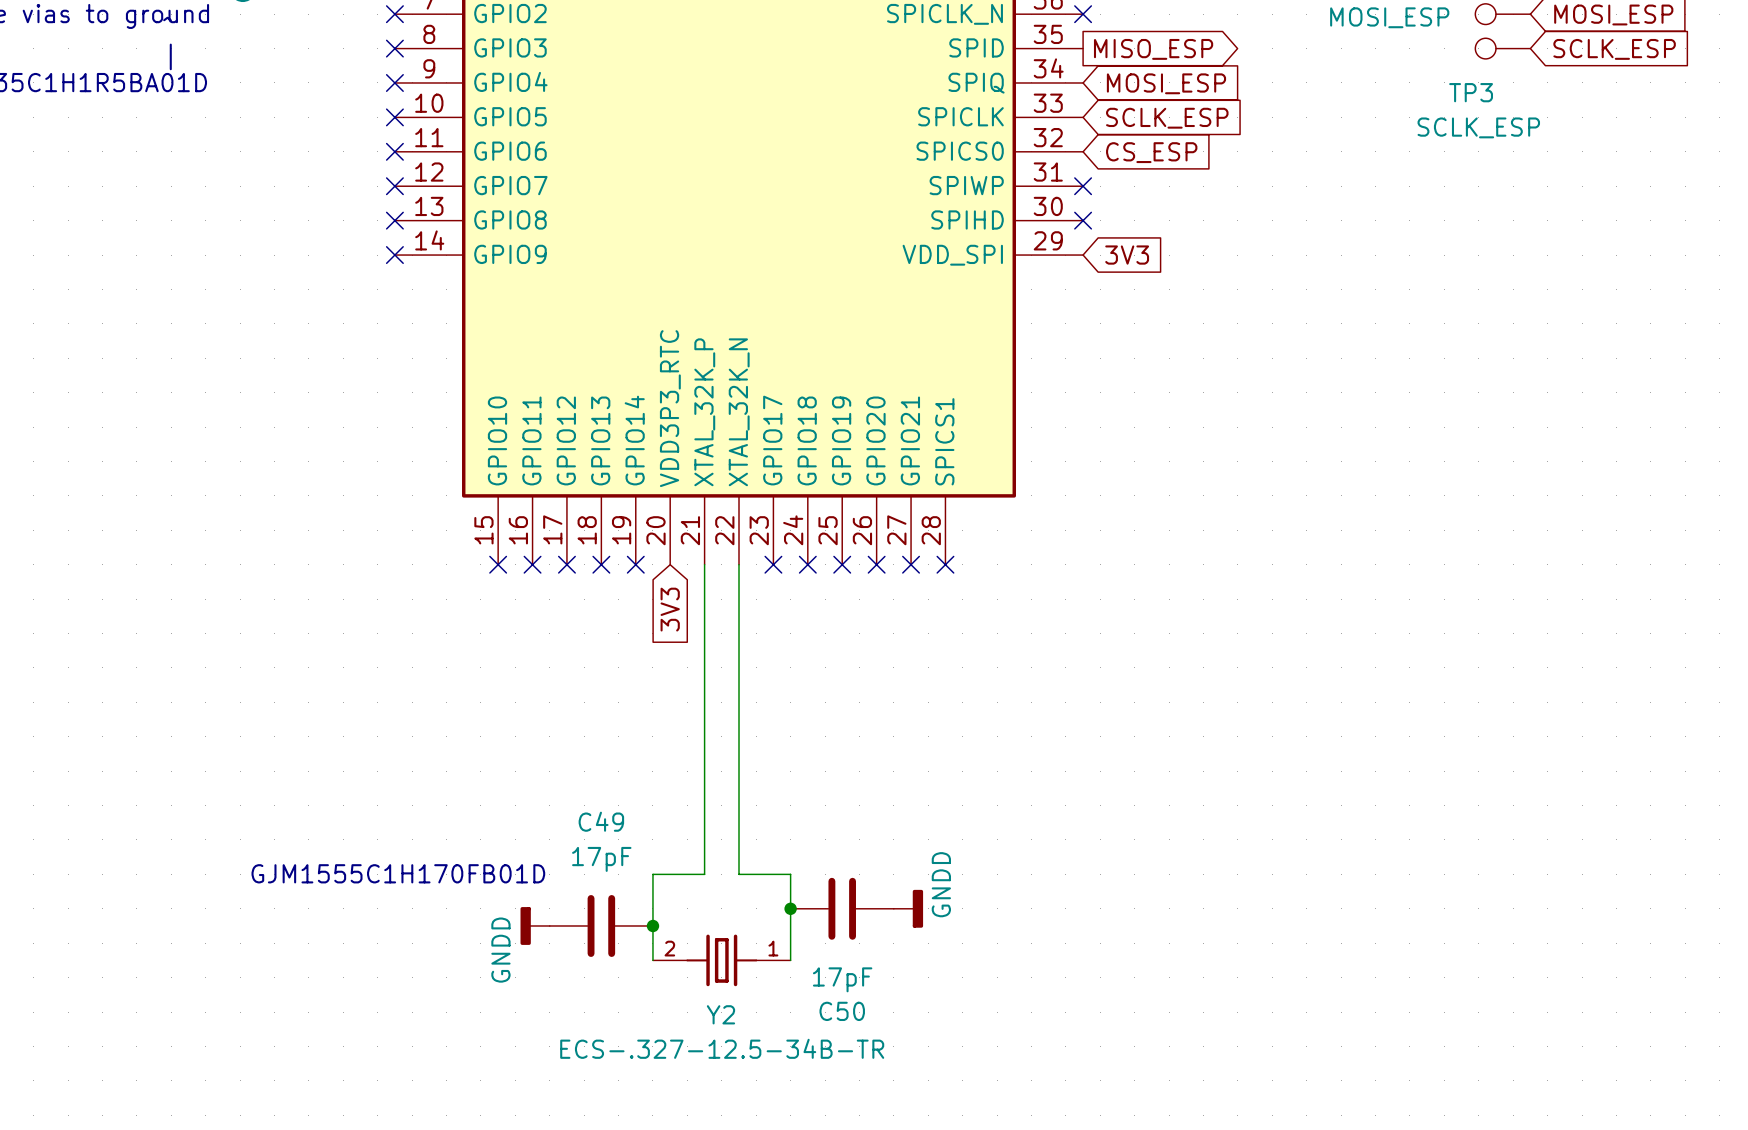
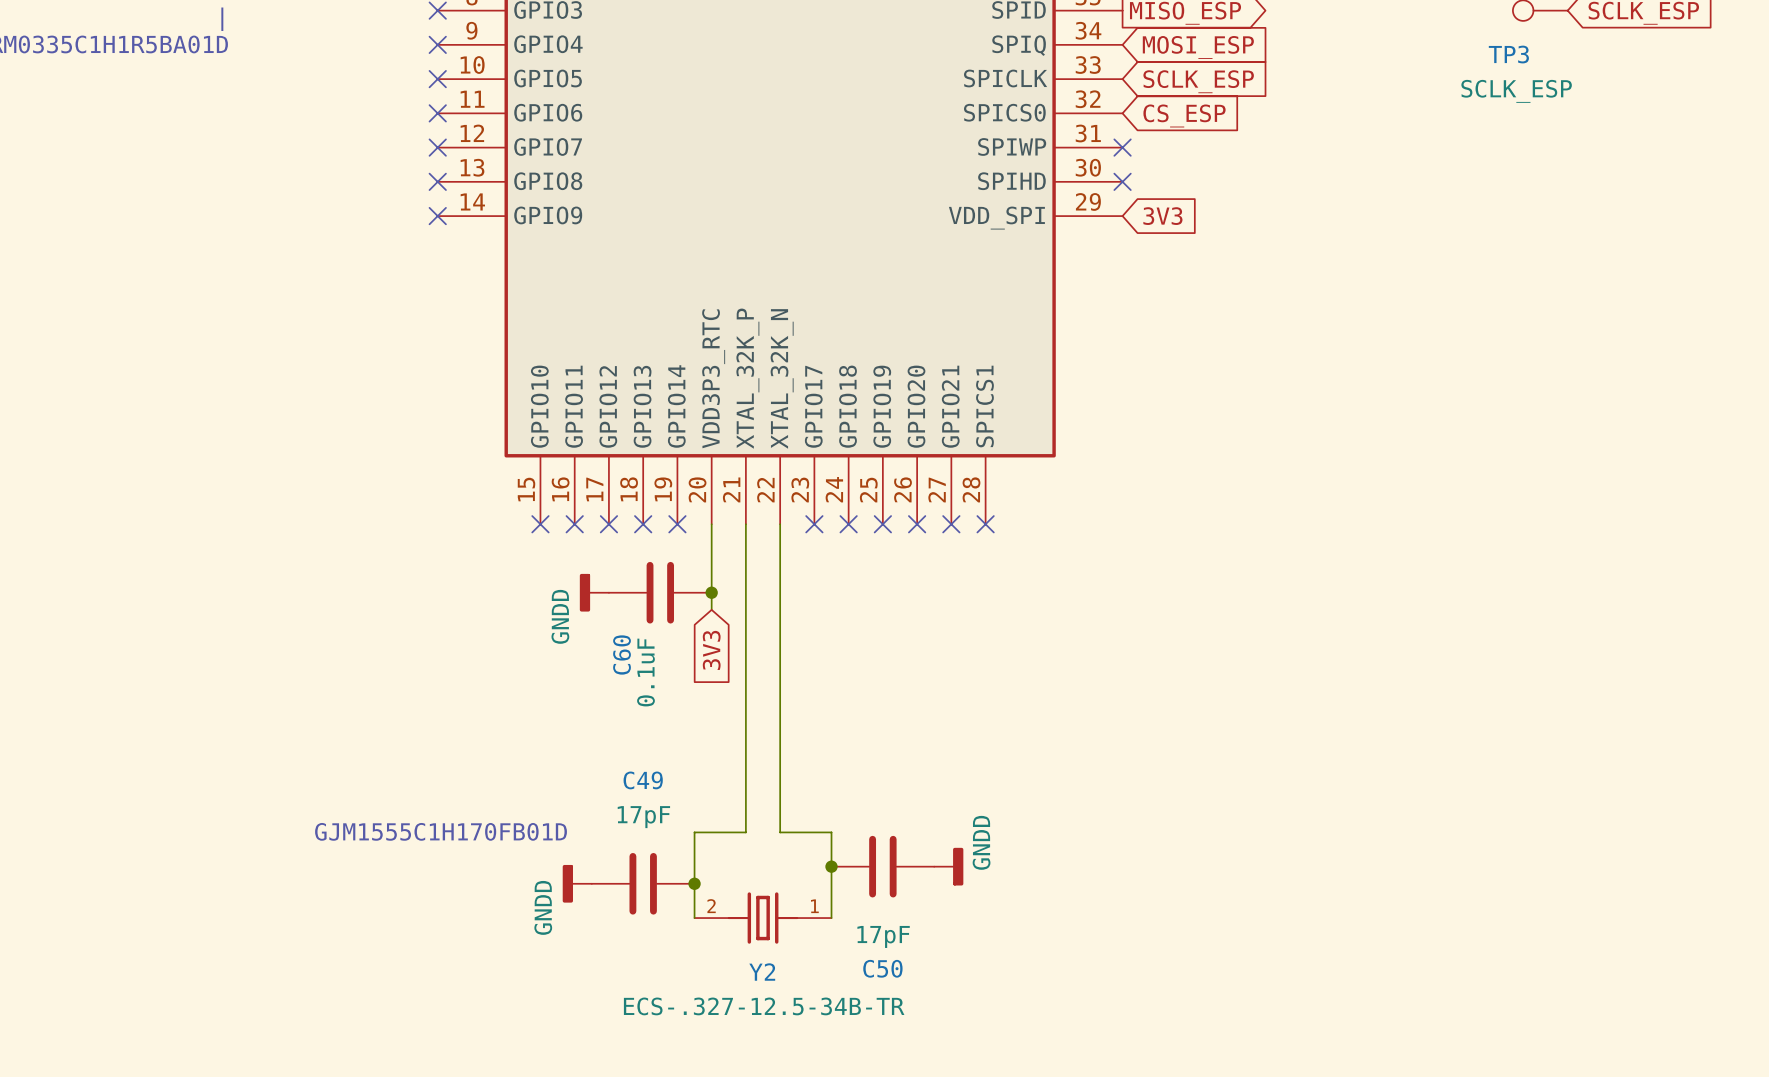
wire: none -> (711, 524) (711, 609)
global label position: 3V3 (670, 609) -> 3V3 (711, 650)
power symbol: none -> GNDD (594, 592)
C60: none -> 0.1uF (660, 592)
junction: none -> (711, 592)

